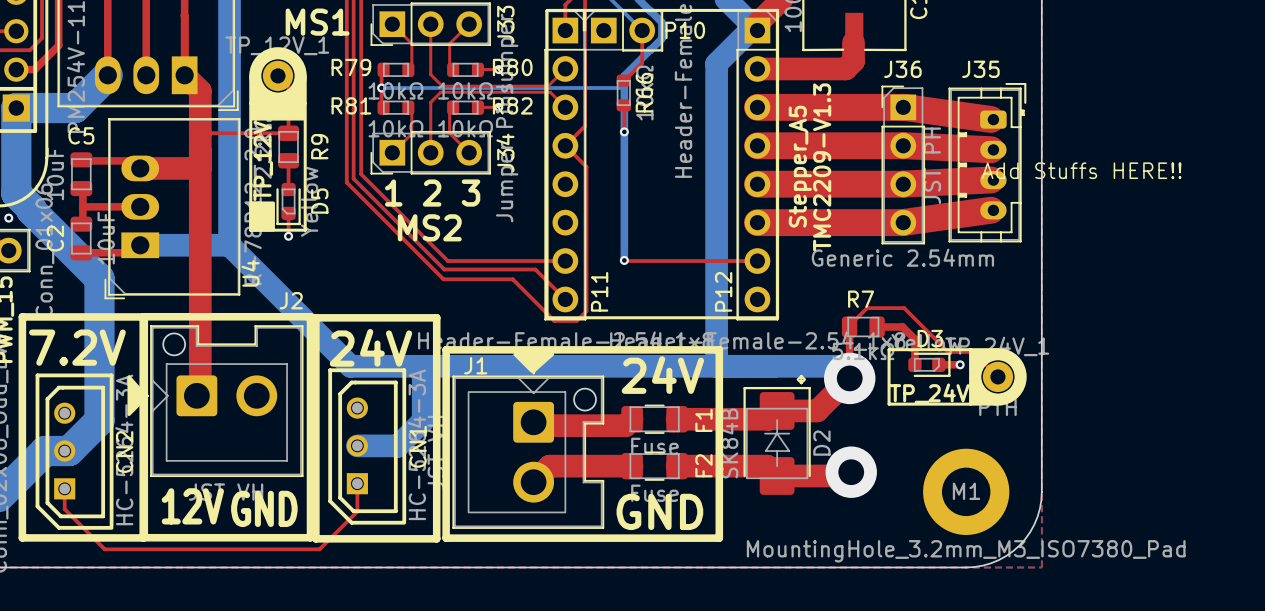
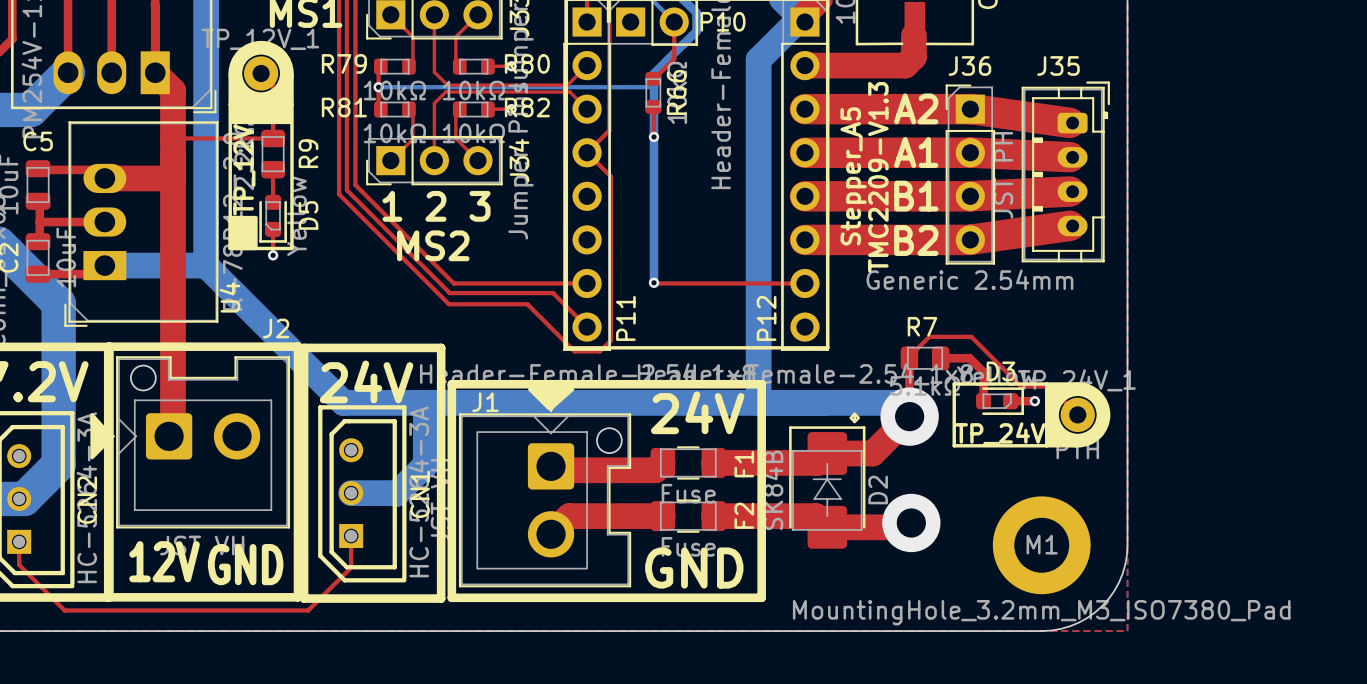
text: none -> A2 (916, 108)
text: none -> A1 (916, 152)
text: Add Stuffs HERE!! (1081, 170) -> none
text: none -> B1 (916, 196)
text: none -> B2 (916, 240)

